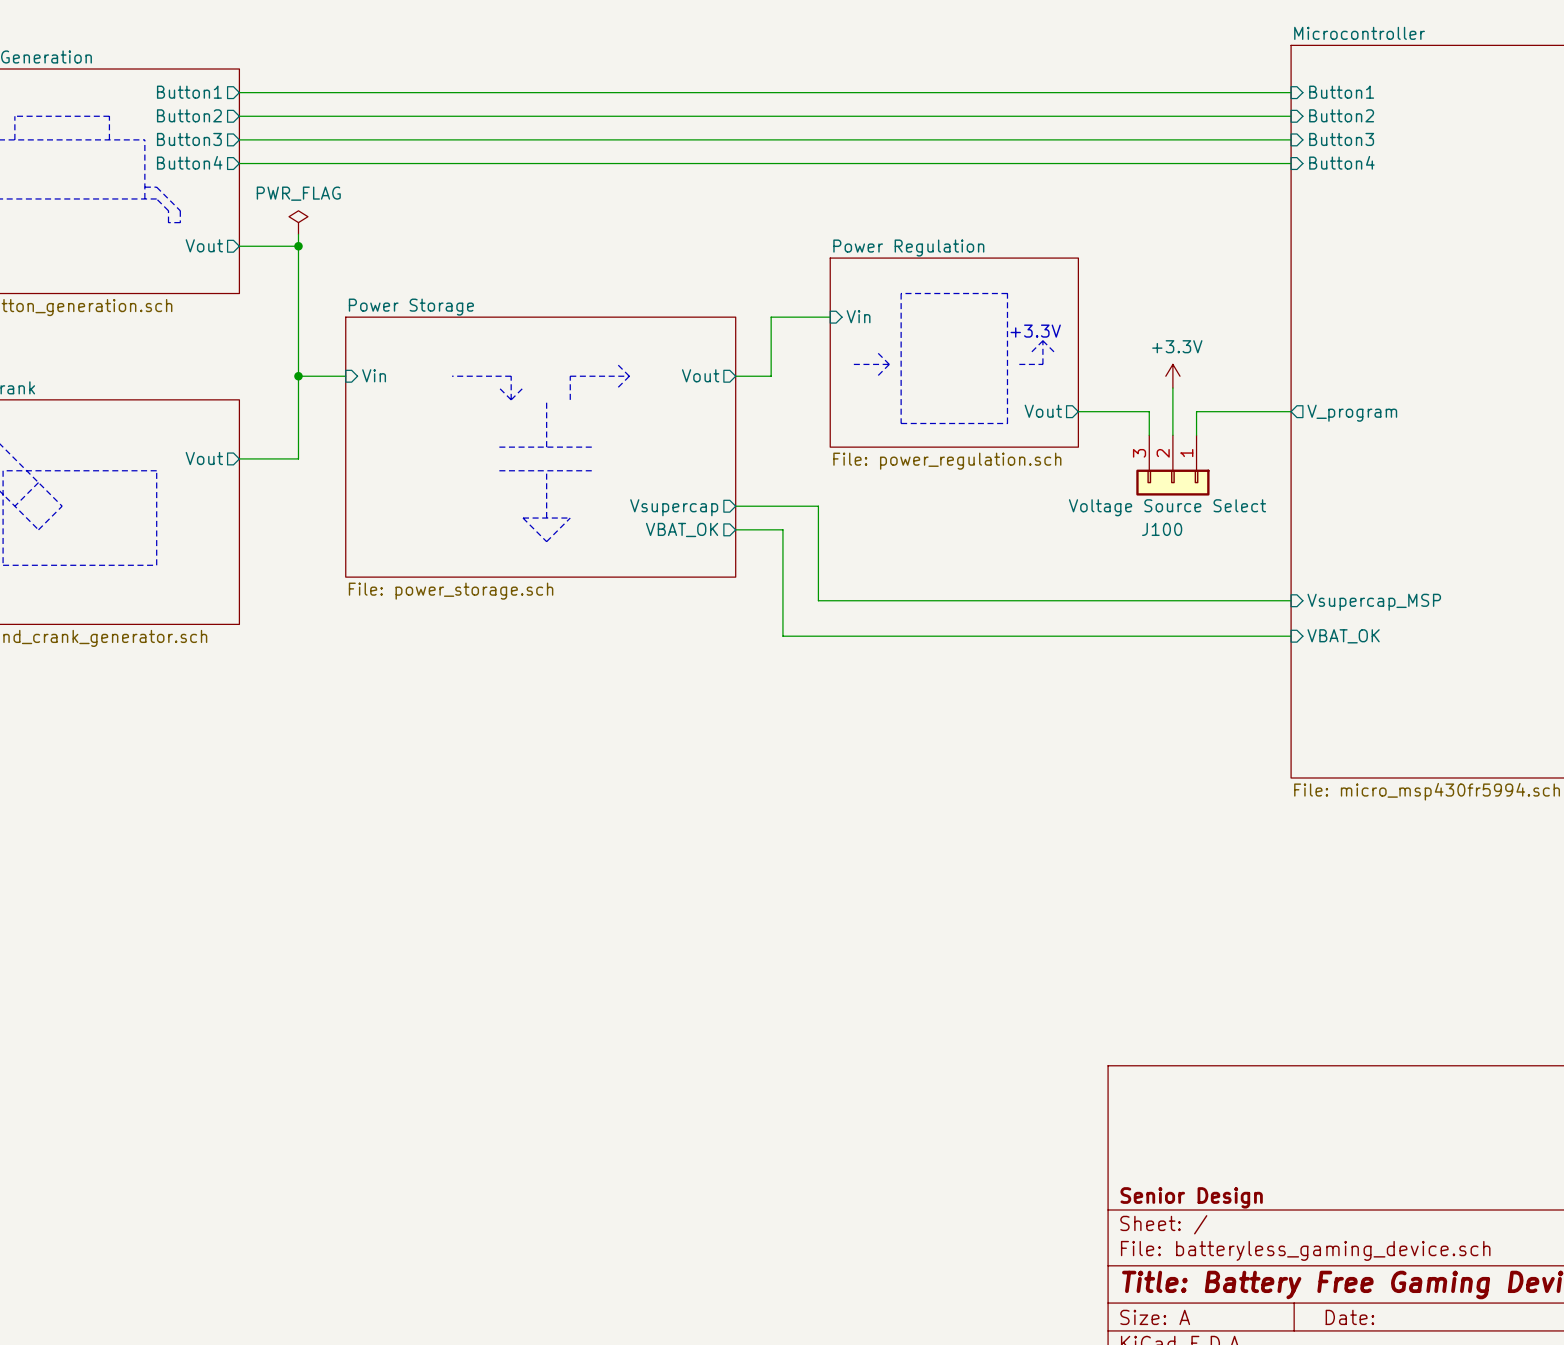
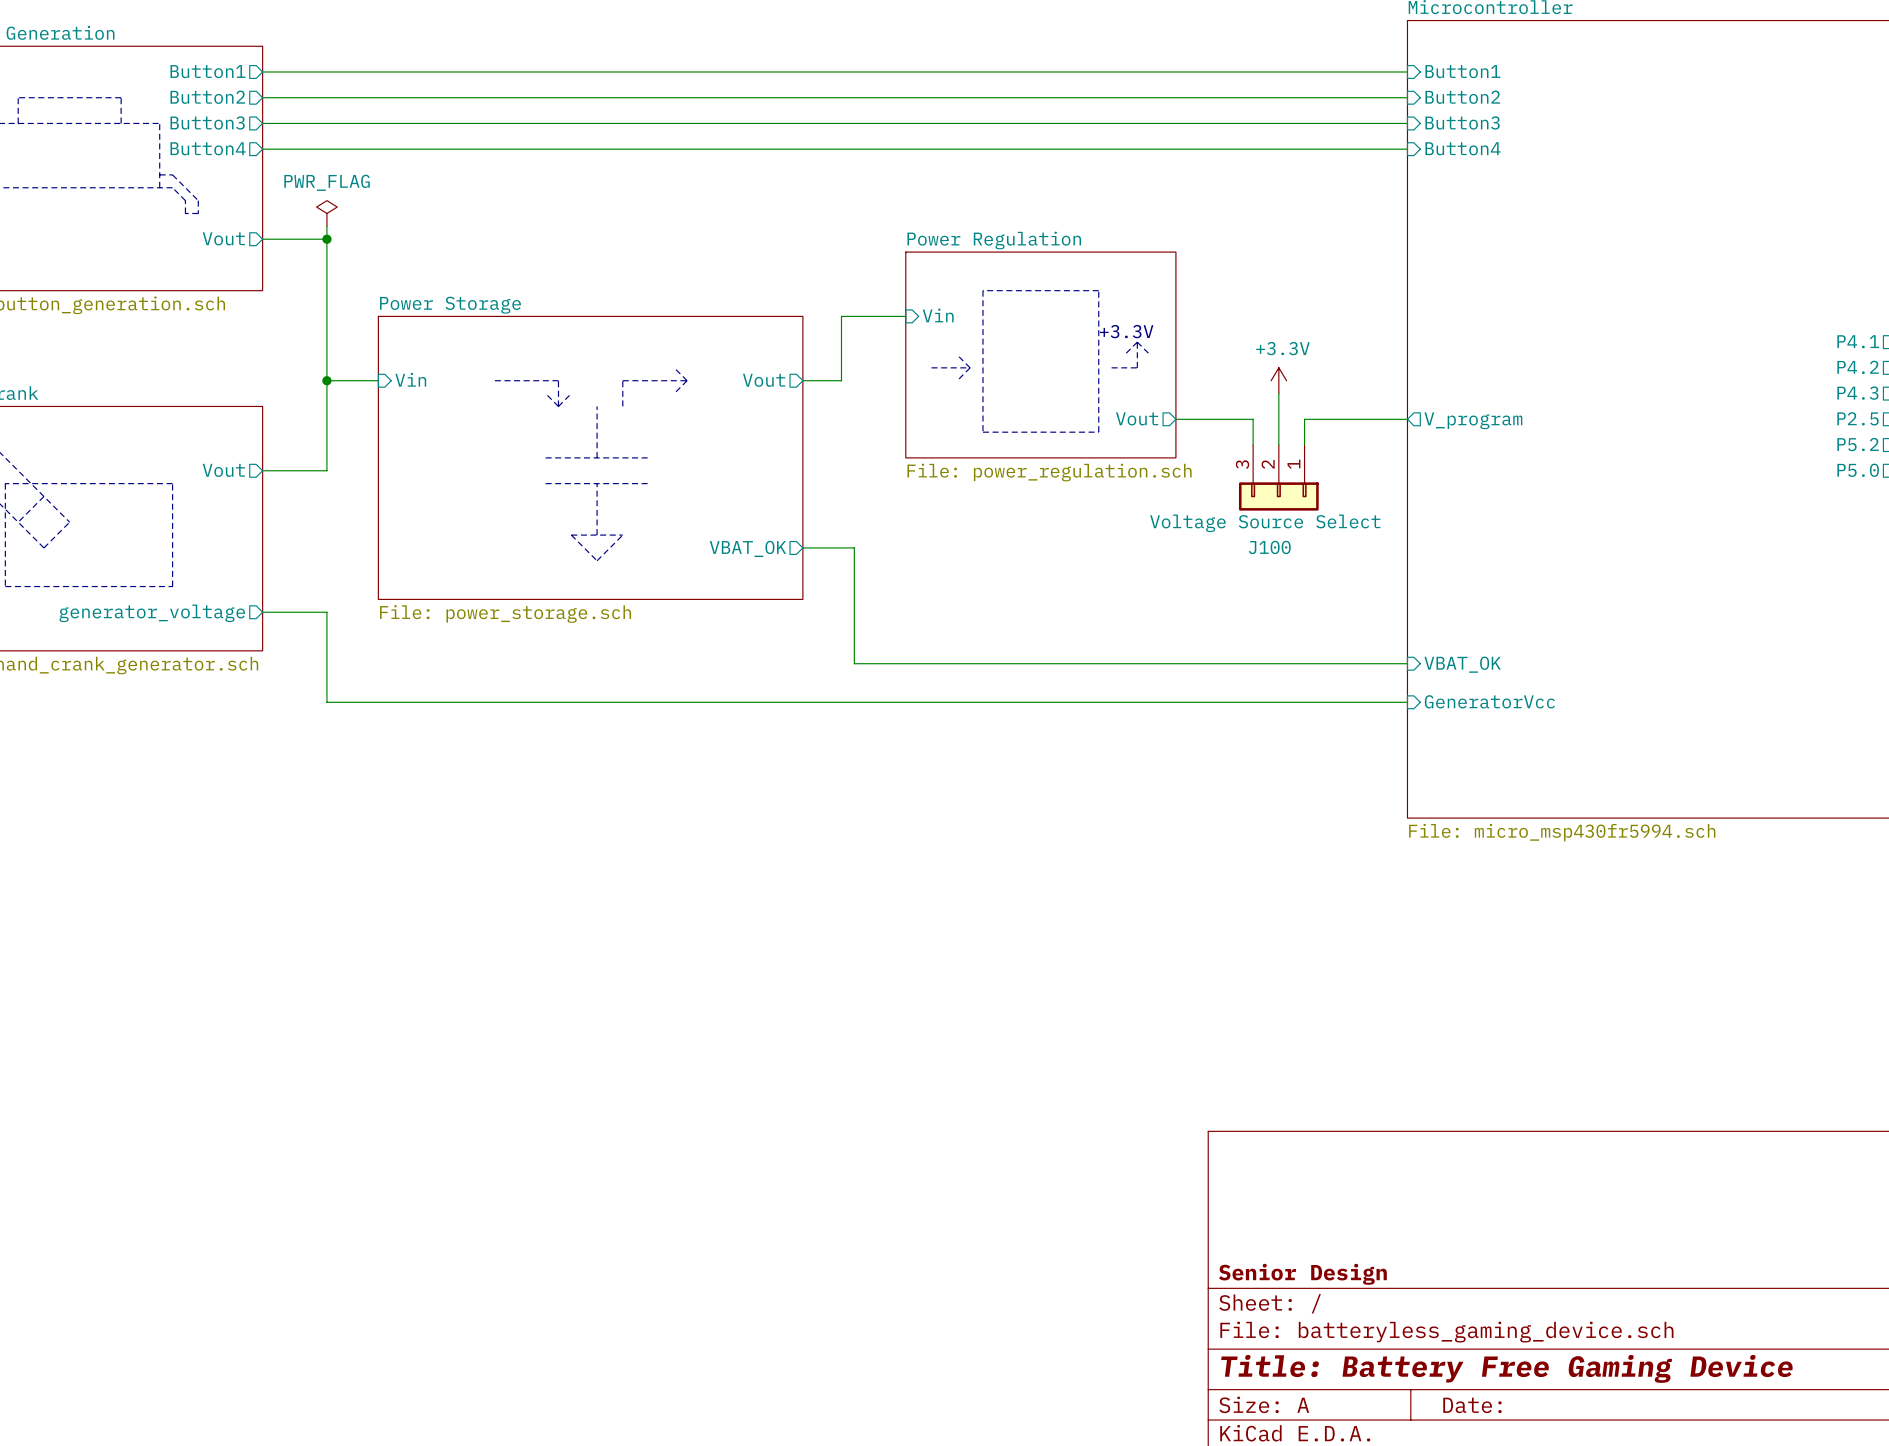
wire: (735, 506) (818, 506) (818, 600) (1291, 600) -> none
sheet pin: Vsupercap (674, 507) -> none
wire: none -> (262, 612) (326, 612) (326, 702) (1407, 702)
sheet pin: none -> generator_voltage (152, 613)
sheet pin: Vsupercap_MSP (1374, 602) -> none
sheet pin: none -> GeneratorVcc (1489, 701)

